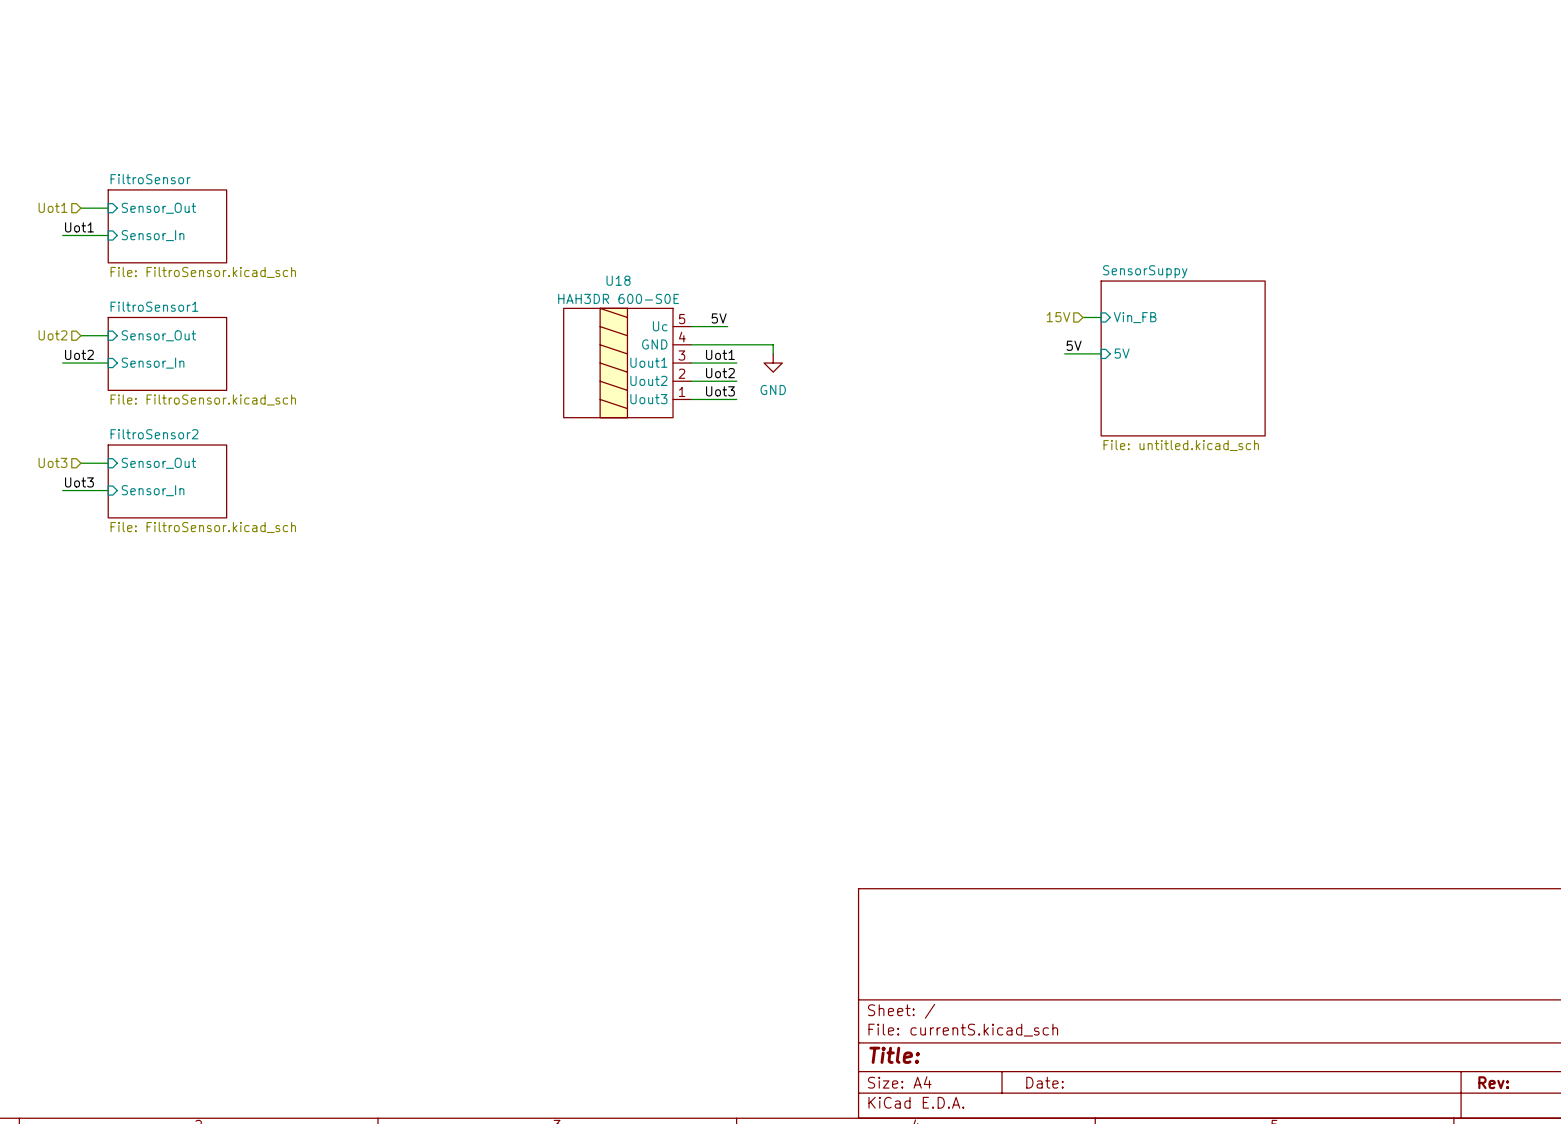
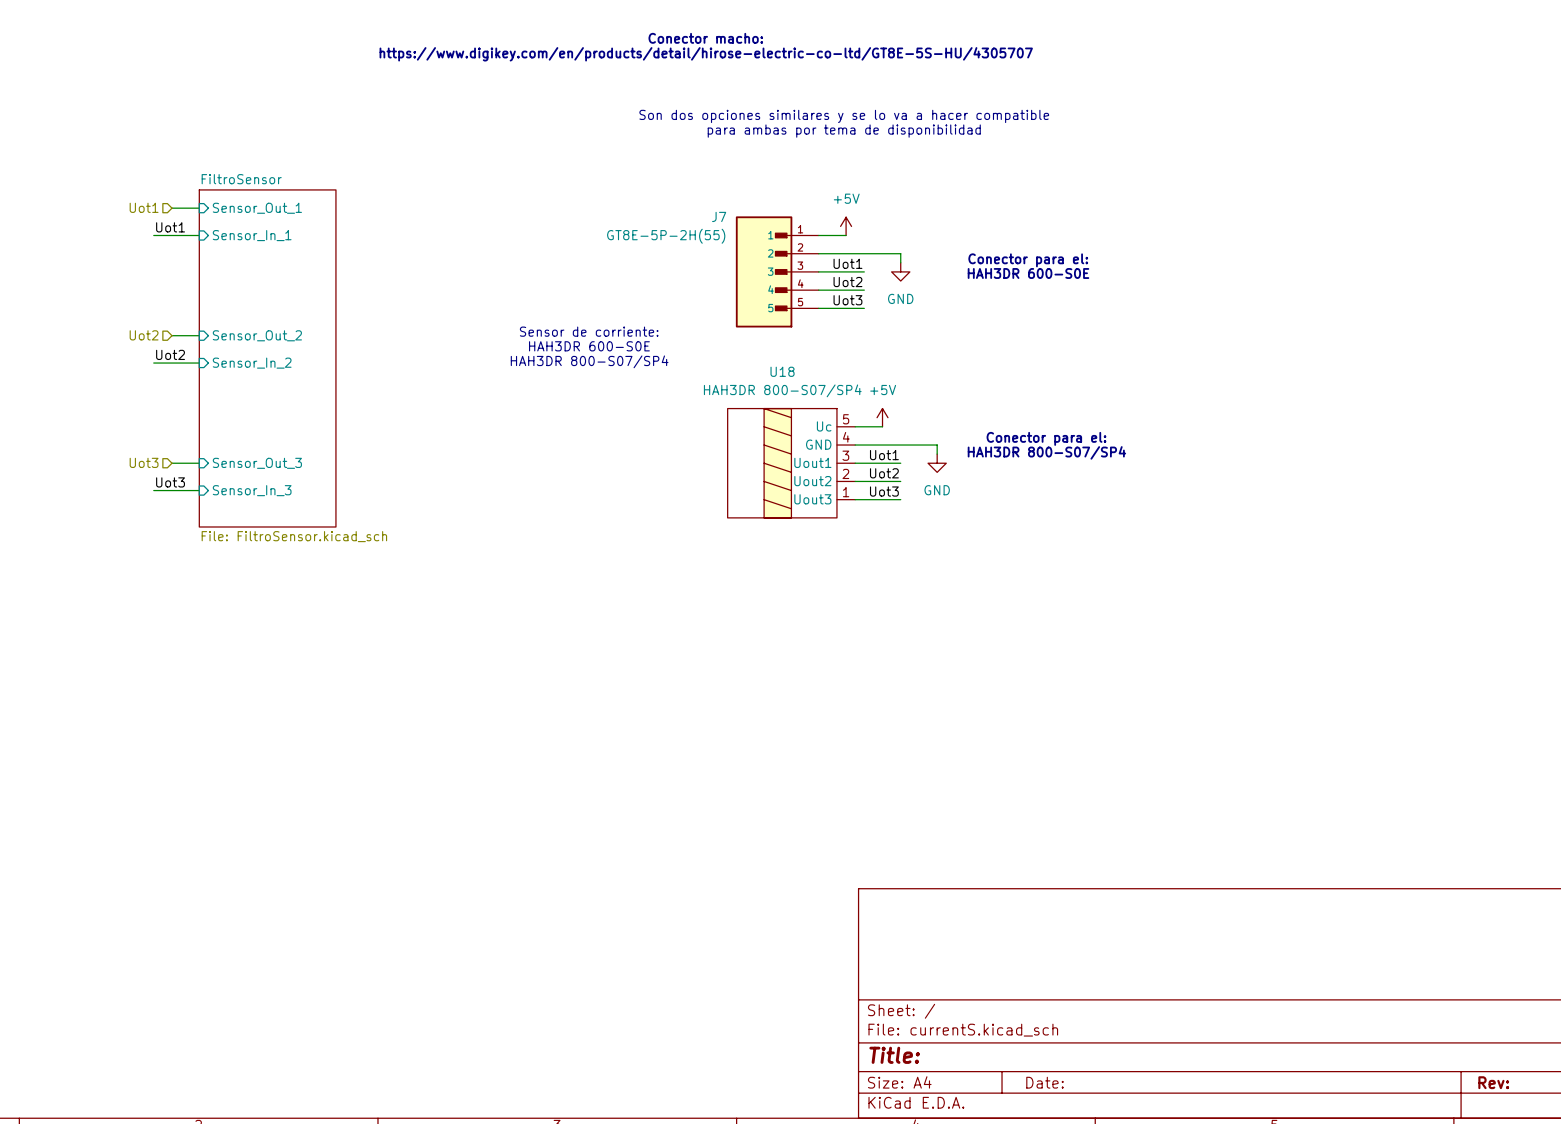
text: none -> Conector macho: (705, 38)
text: none -> https://www.digikey.com/en/products/detail/hirose-electric-co-ltd/GT8E-5S-HU/4305707 (706, 54)
text: none -> Son dos opciones similares y se lo va a hacer compatible (844, 116)
text: none -> para ambas por tema de disponibilidad (844, 131)
hierarchical label position: Uot1 (52, 207) -> Uot1 (144, 207)
wire: (80, 208) (108, 208) -> (171, 208) (199, 208)
sheet pin: Sensor_Out (158, 208) -> Sensor_Out_1 (257, 208)
sheet FiltroSensor: File: FiltroSensor.kicad_sch (167, 226) -> none
power symbol: none -> +5V (846, 226)
label position: Uot1 (79, 227) -> Uot1 (170, 227)
wire: (62, 235) (108, 235) -> (153, 235) (199, 235)
sheet pin: Sensor_In (153, 235) -> none
sheet pin: none -> Sensor_In_1 (252, 235)
wire: none -> (818, 235) (846, 235)
text: none -> Conector para el: (1028, 260)
label: none -> Uot1 (847, 263)
J7: none -> GT8E-5P-2H(55) (777, 271)
power symbol: none -> GND (900, 271)
text: none -> HAH3DR 600-S0E (1028, 273)
U18 name position: U18 (618, 280) -> U18 (782, 371)
label: none -> Uot2 (847, 282)
U18 value: HAH3DR 600-S0E (618, 298) -> HAH3DR 800-S07/SP4 (782, 390)
label: none -> Uot3 (847, 300)
hierarchical label: 15V (1058, 317) -> none
wire: (1082, 317) (1101, 317) -> none
sheet pin: Vin_FB (1135, 317) -> none
label: 5V (719, 318) -> none
wire: (691, 326) (727, 326) -> none
text: none -> Sensor de corriente: (589, 331)
hierarchical label position: Uot2 (52, 335) -> Uot2 (144, 335)
wire: (80, 335) (108, 335) -> (171, 335) (199, 335)
sheet pin: Sensor_Out (158, 335) -> Sensor_Out_2 (257, 335)
wire: (691, 344) (773, 344) (773, 353) -> (818, 253) (900, 253) (900, 262)
label: 5V (1074, 345) -> none
text: none -> HAH3DR 600-S0E (589, 346)
sheet FiltroSensor1: File: FiltroSensor.kicad_sch (167, 353) -> none
wire: (1064, 353) (1101, 353) -> none
sheet pin: 5V (1122, 353) -> none
label position: Uot2 (79, 354) -> Uot2 (170, 354)
label: Uot1 (720, 354) -> none
sheet FiltroSensor: none -> File: FiltroSensor.kicad_sch (267, 358)
sheet SensorSuppy: File: untitled.kicad_sch (1183, 358) -> none
text: none -> HAH3DR 800-S07/SP4 (589, 361)
wire: (62, 363) (108, 363) -> (153, 363) (199, 363)
sheet pin: Sensor_In (153, 363) -> none
sheet pin: none -> Sensor_In_2 (252, 363)
U18 position: (627, 363) -> (791, 463)
wire: (691, 363) (736, 363) -> (818, 271) (864, 271)
power symbol: GND (773, 363) -> none
label: Uot2 (720, 373) -> none
wire: (691, 381) (736, 381) -> (818, 290) (864, 290)
label: Uot3 (720, 391) -> none
wire: (691, 399) (736, 399) -> (818, 308) (864, 308)
power symbol: none -> +5V (882, 417)
wire: none -> (855, 426) (882, 426)
text: none -> Conector para el: (1046, 438)
wire: none -> (855, 445) (937, 445) (937, 454)
text: none -> HAH3DR 800-S07/SP4 (1046, 452)
label: none -> Uot1 (884, 455)
hierarchical label position: Uot3 (52, 462) -> Uot3 (144, 462)
wire: (80, 463) (108, 463) -> (171, 463) (199, 463)
sheet pin: Sensor_Out (158, 463) -> Sensor_Out_3 (257, 463)
wire: none -> (855, 463) (900, 463)
power symbol: none -> GND (937, 463)
label: none -> Uot2 (884, 473)
sheet FiltroSensor2: File: FiltroSensor.kicad_sch (167, 481) -> none
wire: none -> (855, 481) (900, 481)
label position: Uot3 (79, 482) -> Uot3 (170, 482)
wire: (62, 490) (108, 490) -> (153, 490) (199, 490)
sheet pin: Sensor_In (153, 490) -> none
sheet pin: none -> Sensor_In_3 (252, 490)
label: none -> Uot3 (884, 491)
wire: none -> (855, 499) (900, 499)

